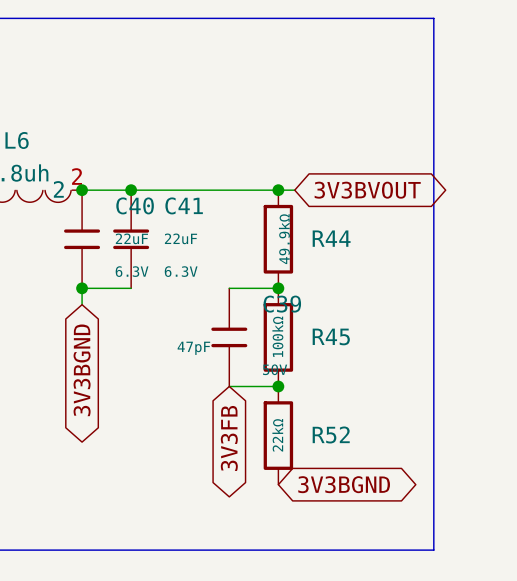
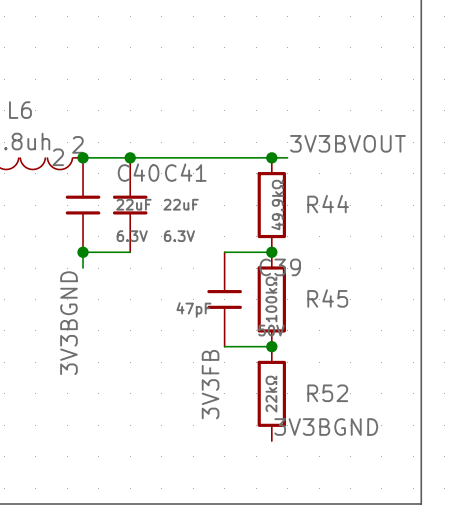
label: none -> 3V3BVOUT (347, 143)
global label: 3V3BVOUT (367, 190) -> none
label: none -> 3V3BGND (68, 323)
global label: 3V3BGND (82, 370) -> none
label: none -> 3V3FB (210, 384)
global label: 3V3FB (229, 438) -> none
label: none -> 3V3BGND (326, 427)
global label: 3V3BGND (344, 484) -> none

